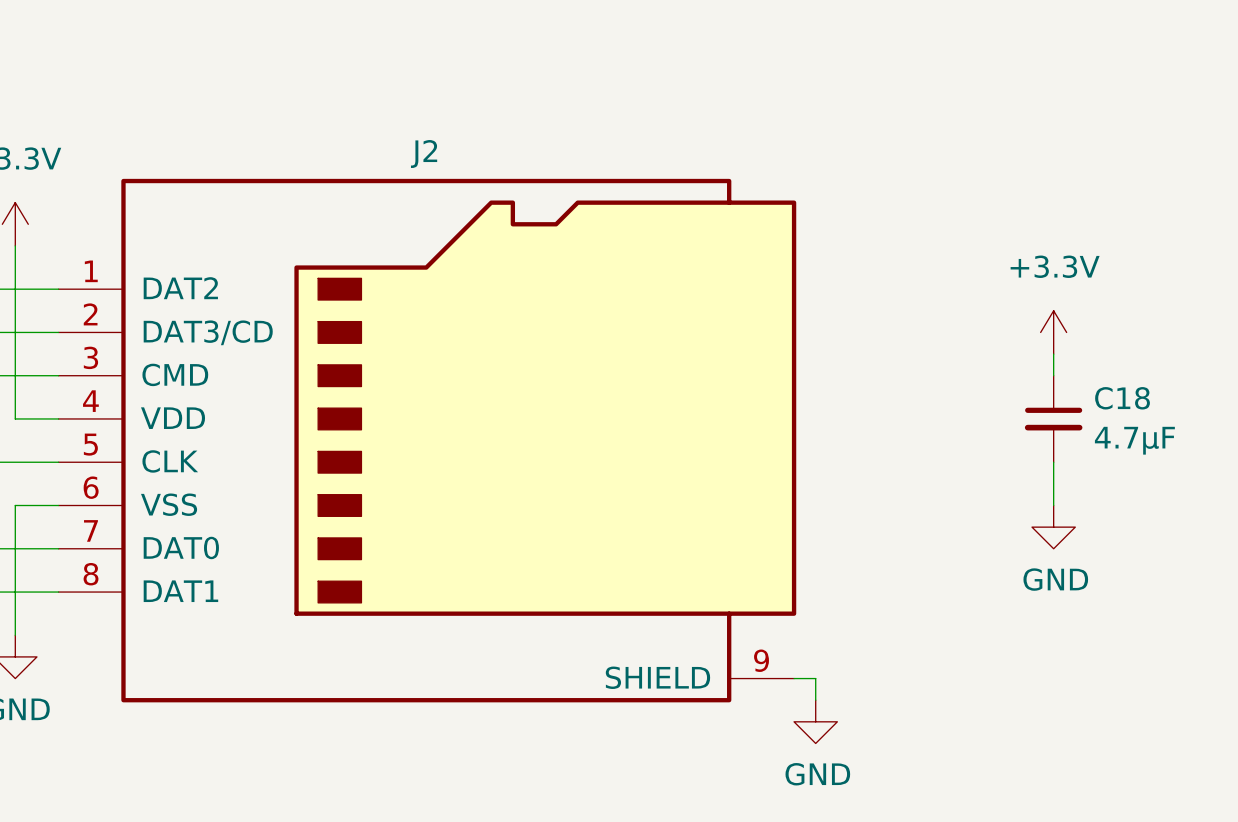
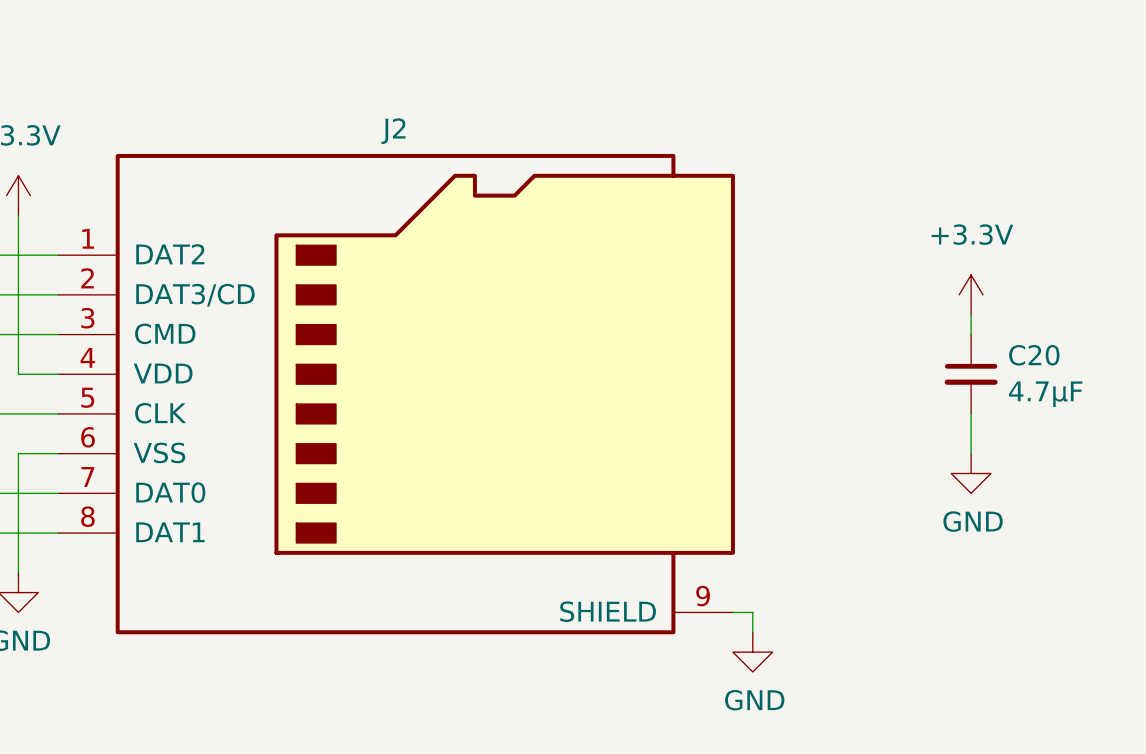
C18 name: C18 (1122, 398) -> C20 (1034, 355)

